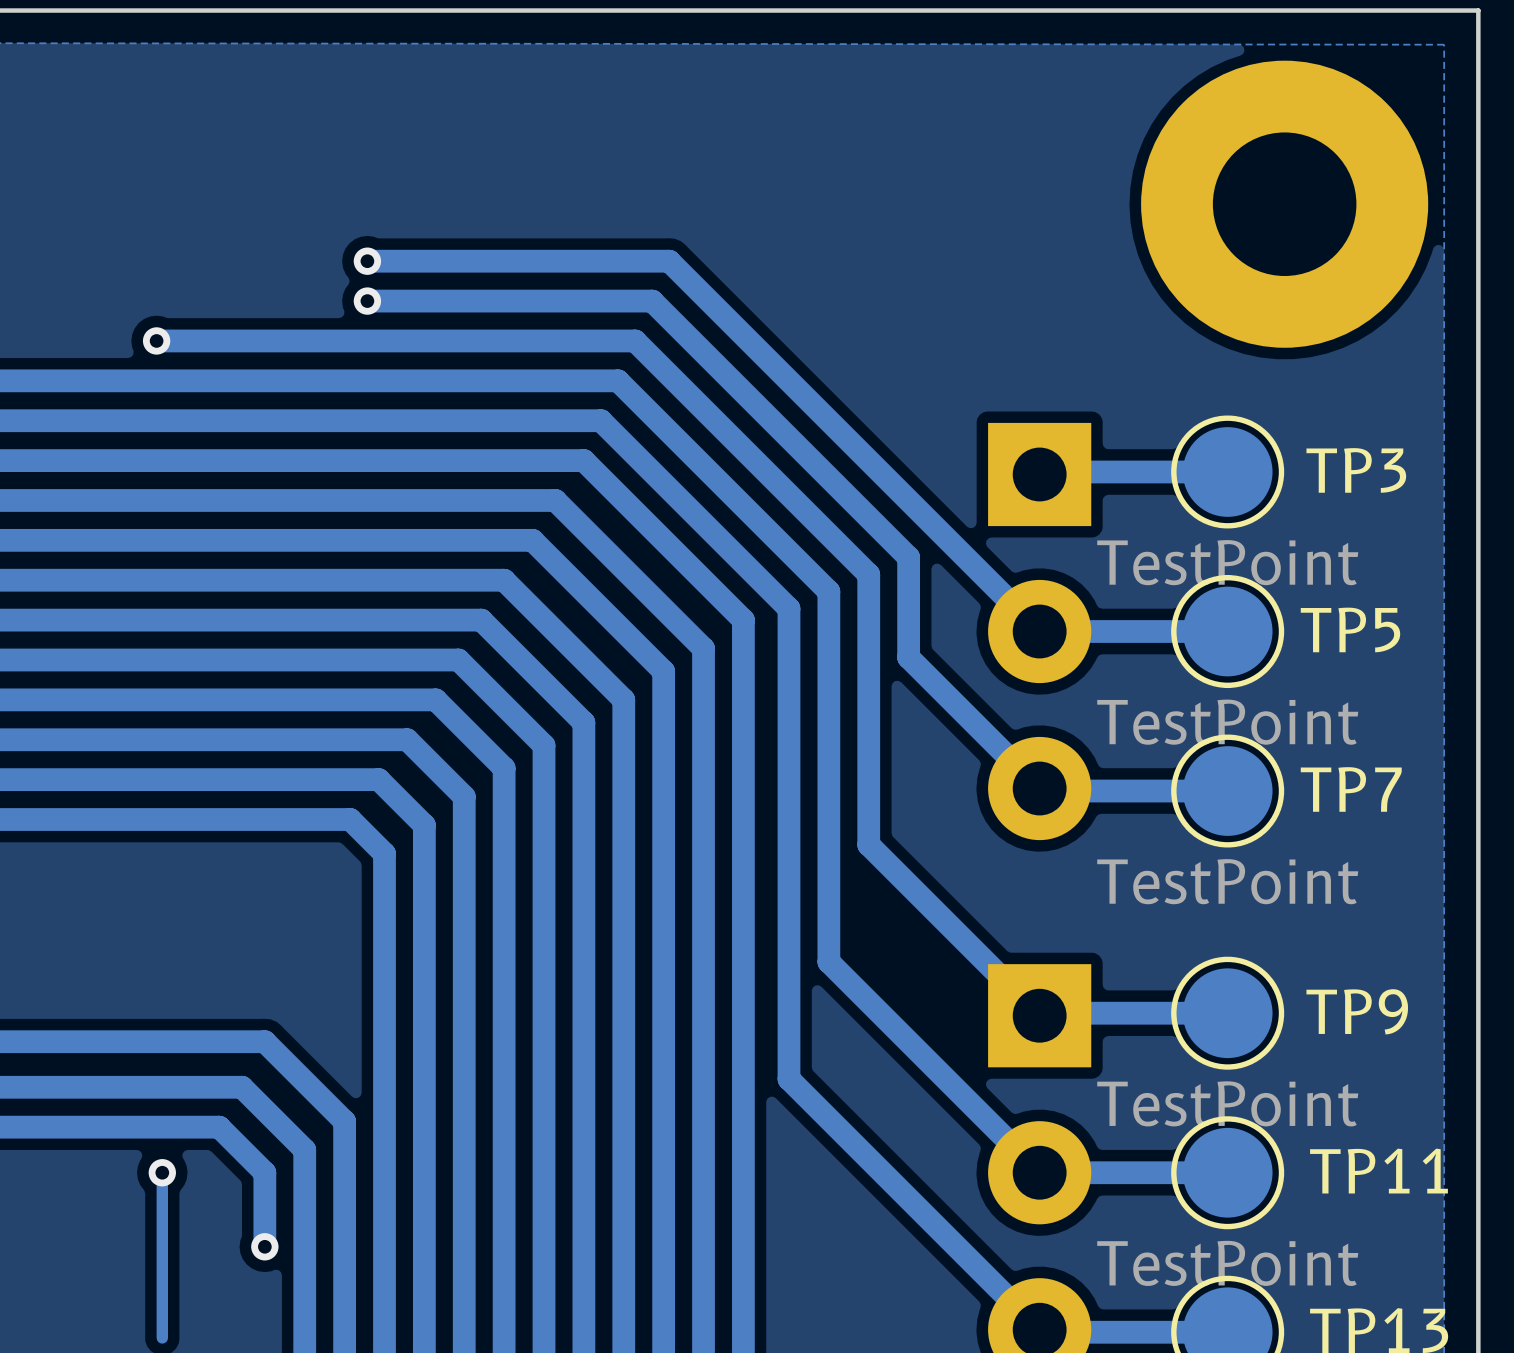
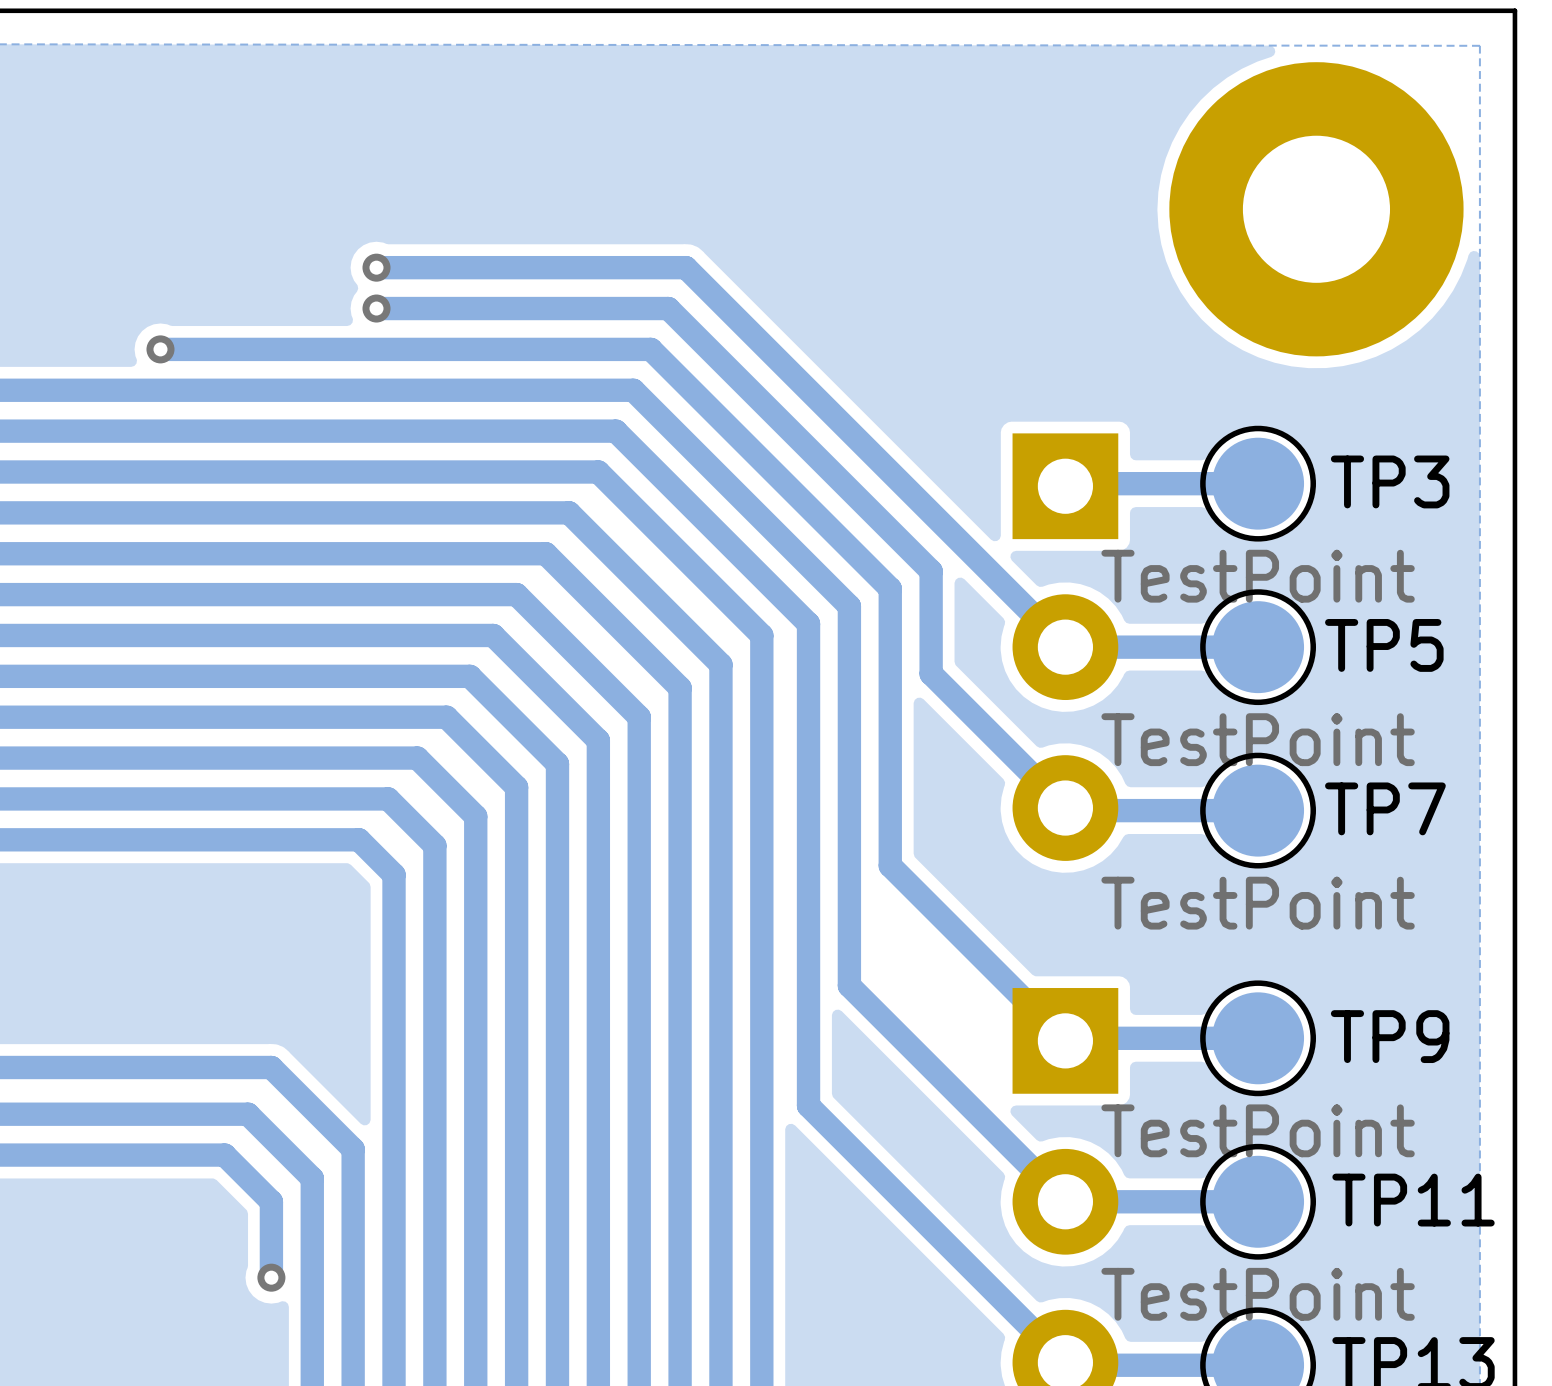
track: (162, 1172) (162, 1337) -> none
via: (162, 1172) -> none

